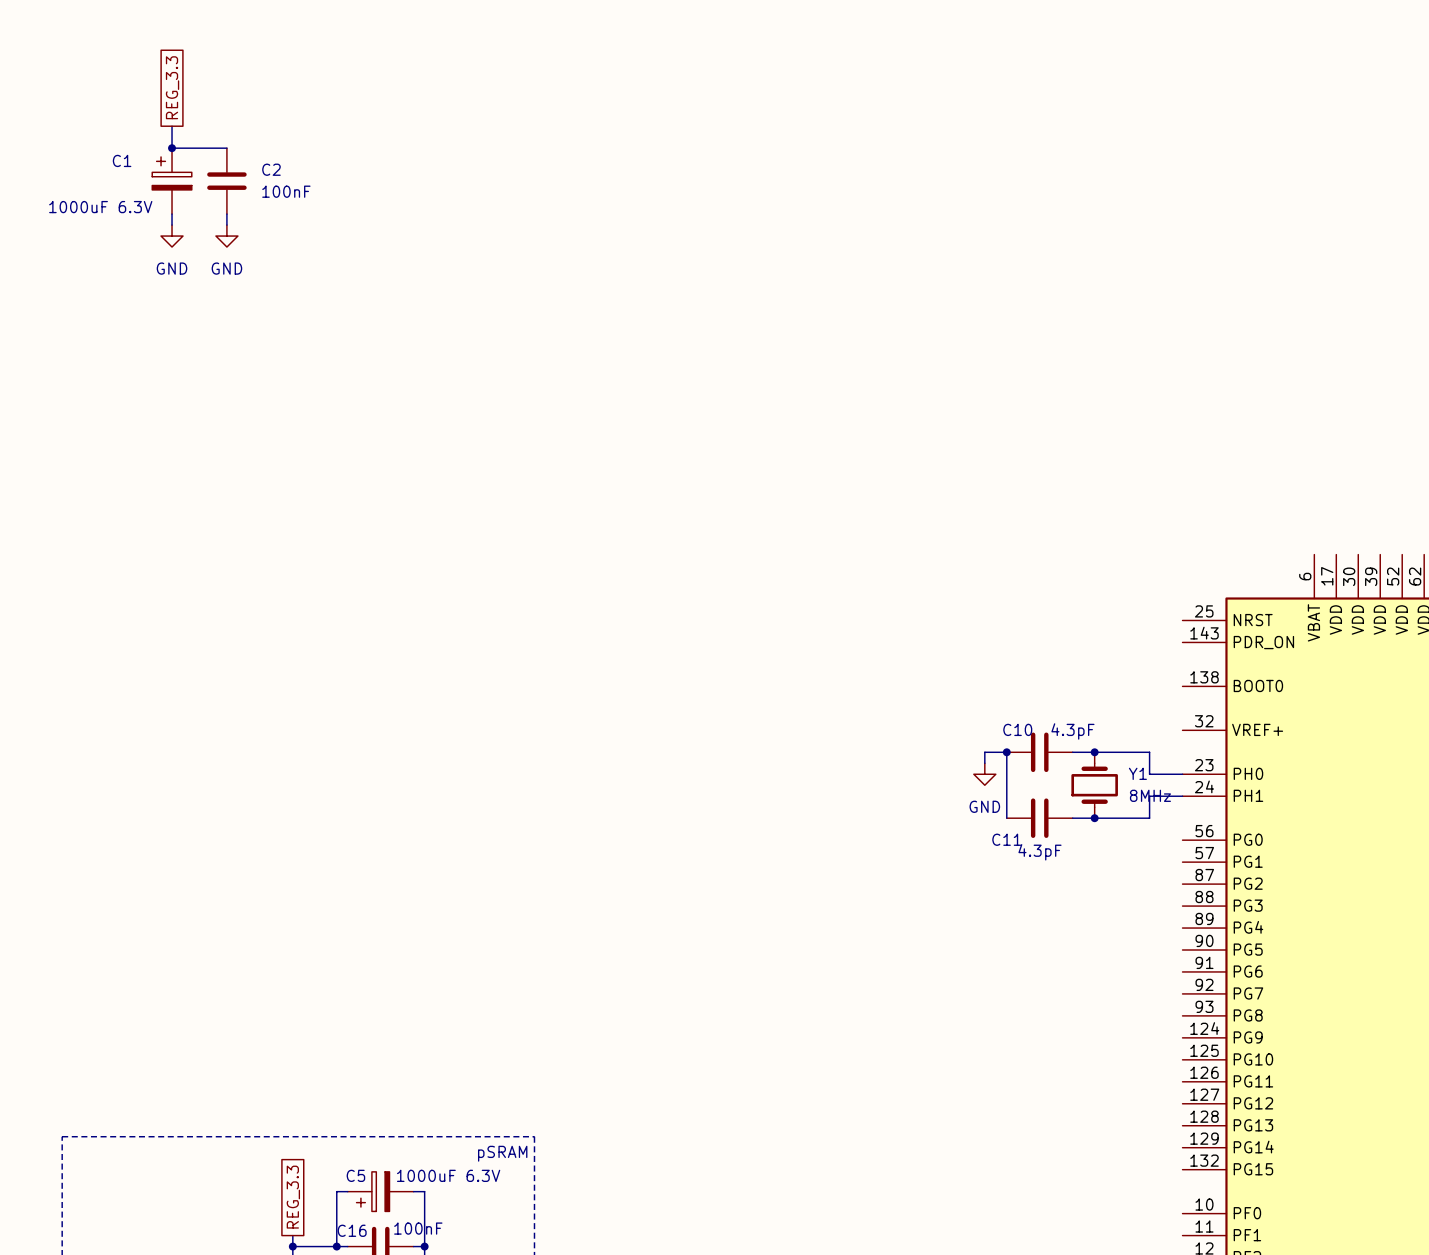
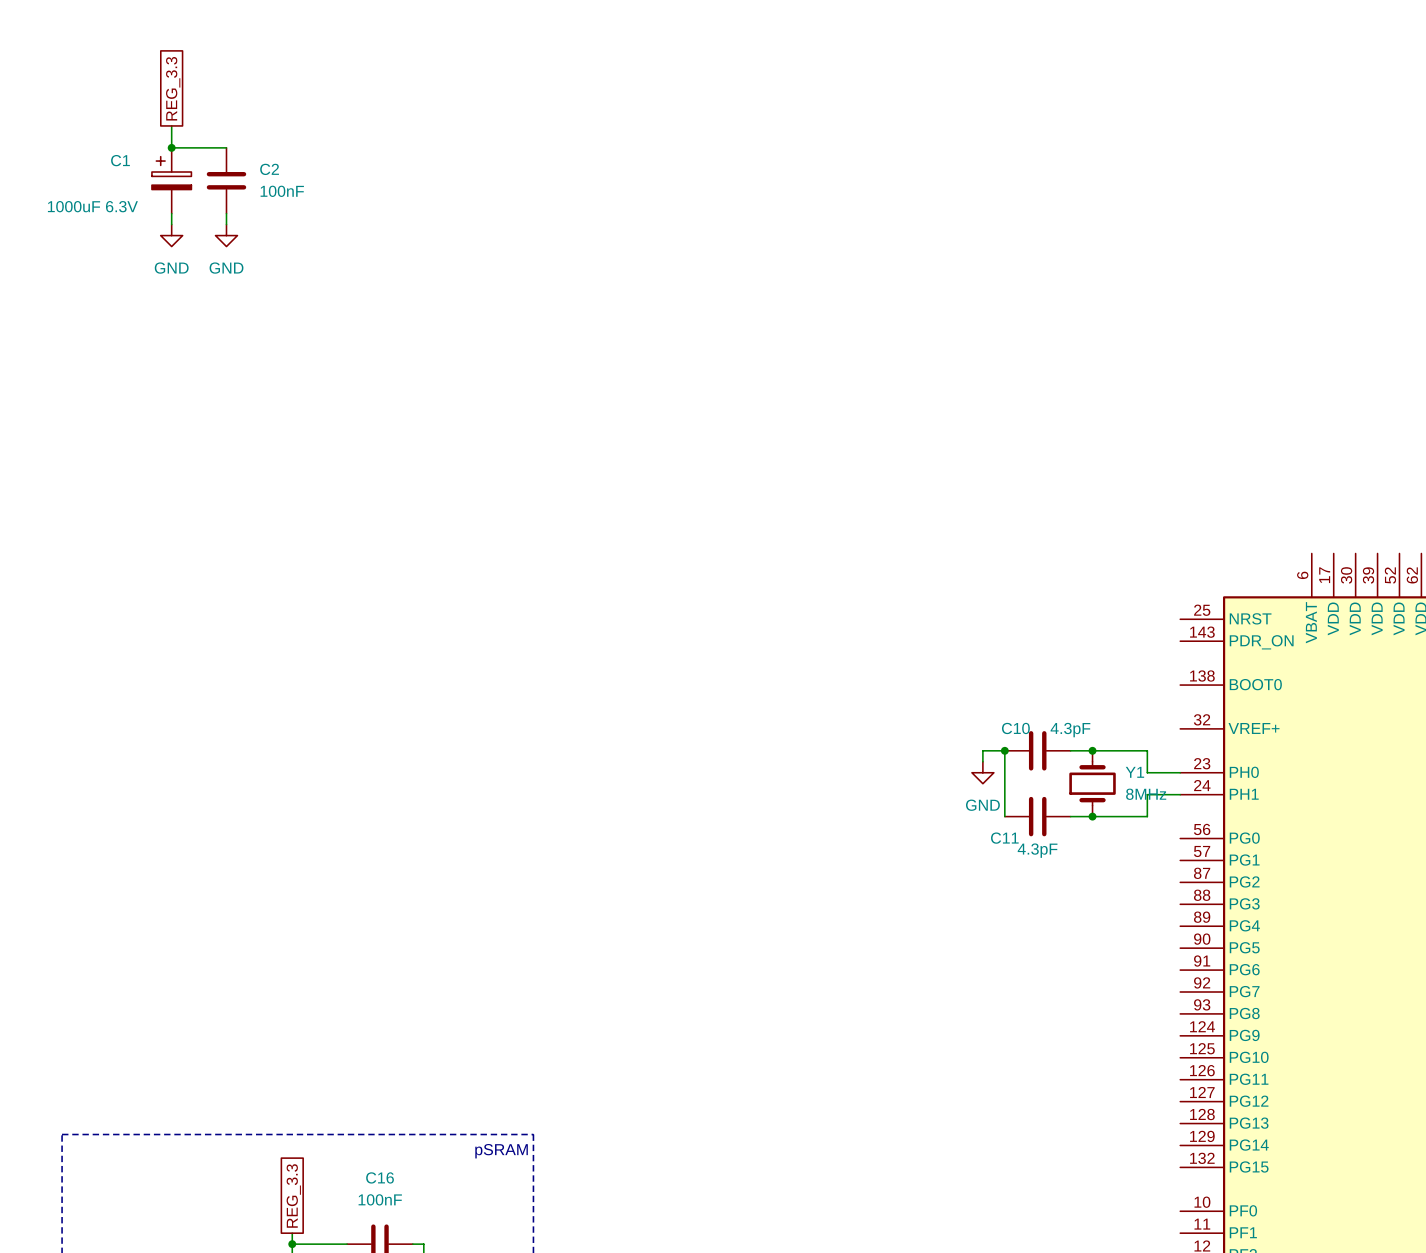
wire: (347, 1191) (336, 1191) (336, 1246) -> none
C5: 1000uF 6.3V (380, 1191) -> none
wire: (413, 1191) (424, 1191) (424, 1246) -> none
C16 value position: 100nF (418, 1228) -> 100nF (380, 1199)
C16 name position: C16 (352, 1230) -> C16 (380, 1177)
junction: (336, 1246) -> none
junction: (424, 1246) -> none

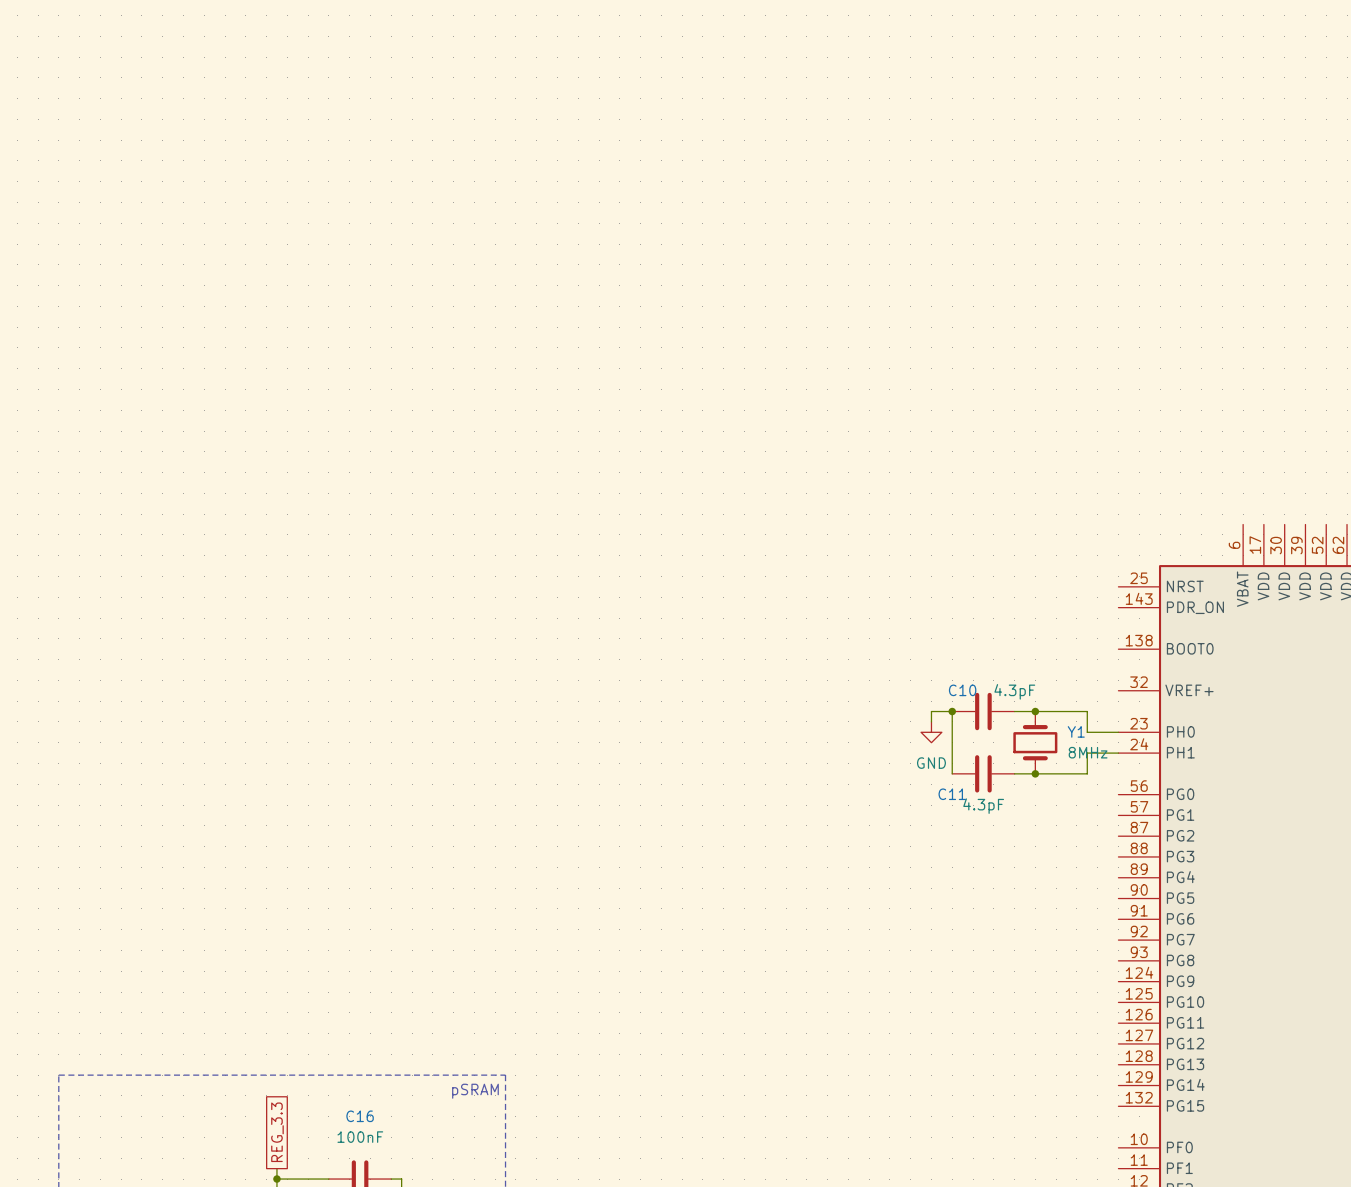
global label: REG_3.3 (173, 88) -> none
wire: (171, 125) (171, 147) (226, 147) -> none
junction: (171, 147) -> none
C1: 1000uF 6.3V (171, 180) -> none
C2: 100nF (226, 180) -> none
wire: (171, 213) (171, 224) -> none
wire: (226, 213) (226, 224) -> none
power symbol: GND (171, 235) -> none
power symbol: GND (226, 235) -> none

